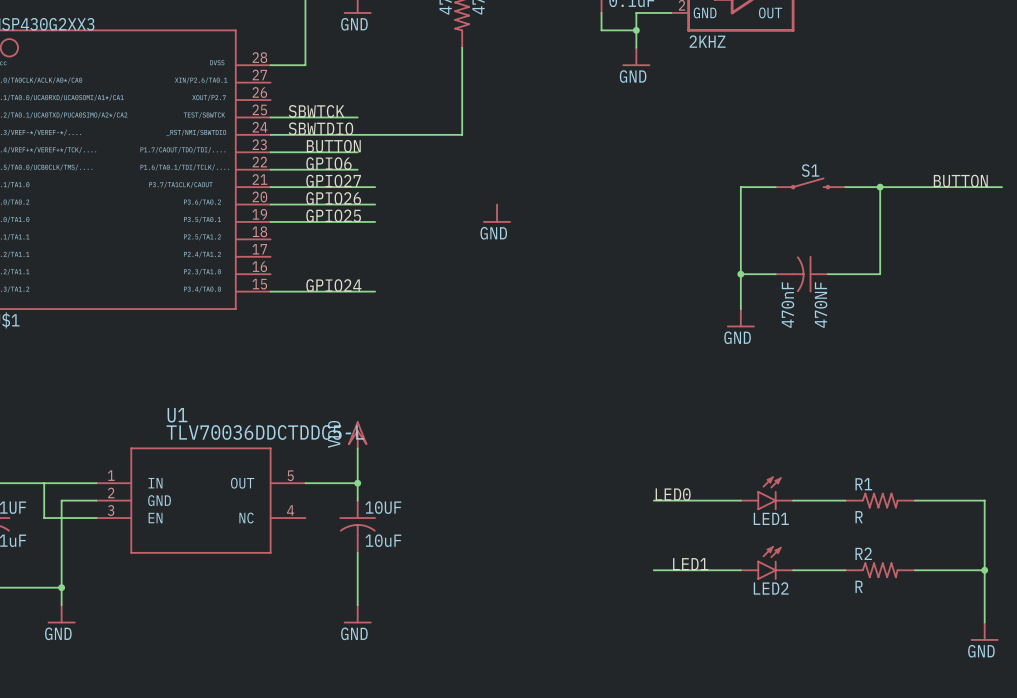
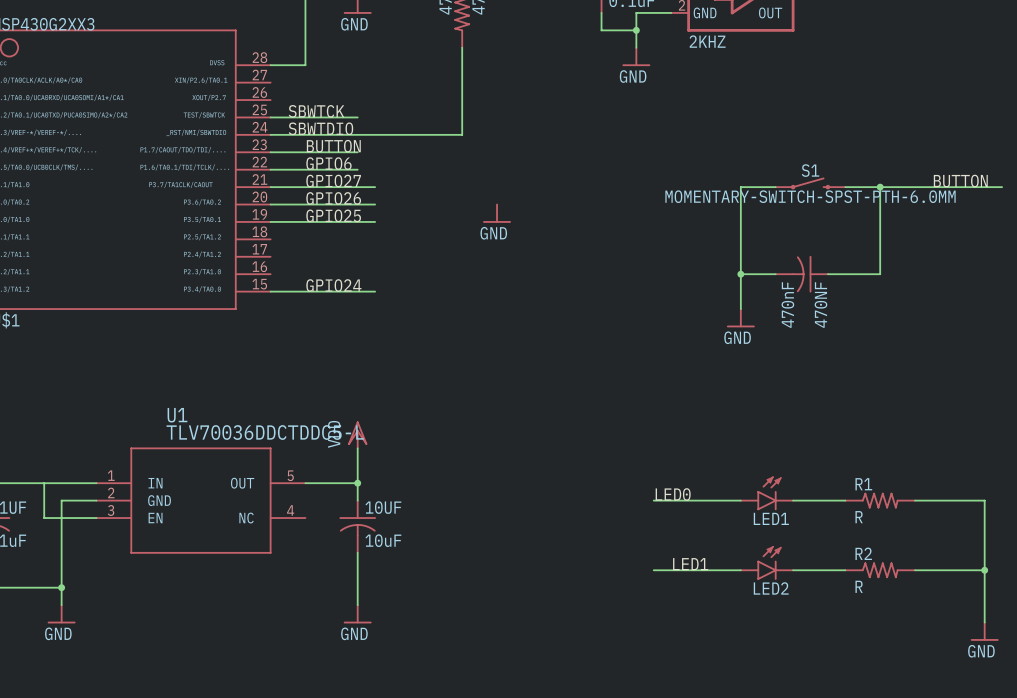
S1 value: none -> MOMENTARY-SWITCH-SPST-PTH-6.0MM (810, 196)

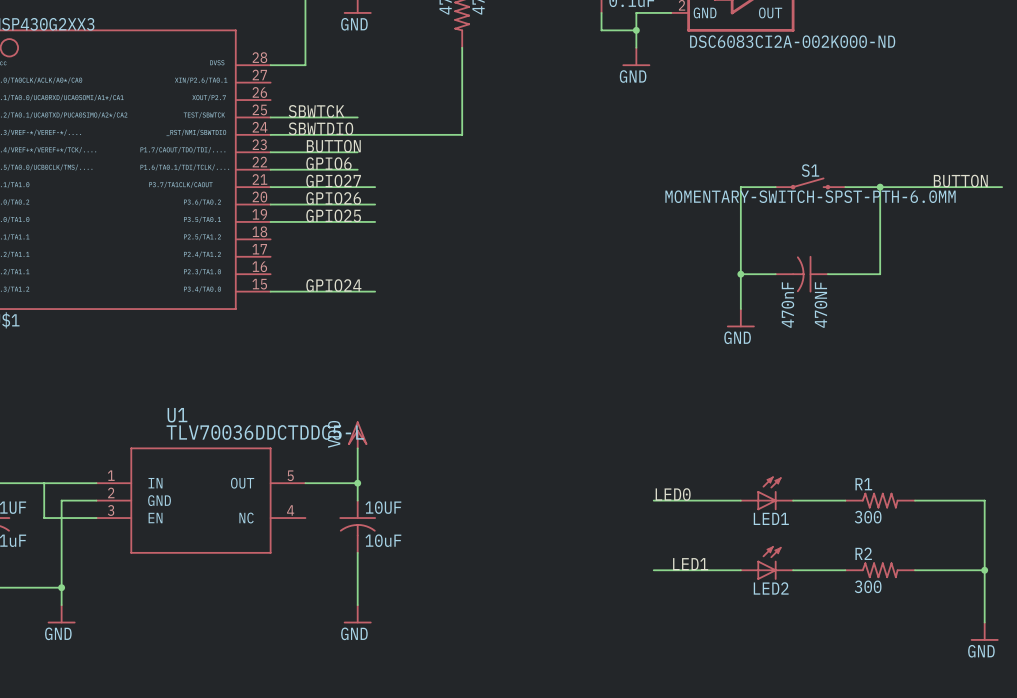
part value: 2KHZ (707, 41) -> DSC6083CI2A-002K000-ND (792, 41)
power symbol: GND (497, 213) -> none
LED1 symbol: [740, 476, 794, 511] -> [740, 476, 794, 511]
R1 value: R (859, 517) -> 300 (868, 517)
LED2 symbol: [740, 546, 794, 580] -> [740, 546, 794, 580]
R2 value: R (859, 586) -> 300 (868, 586)

